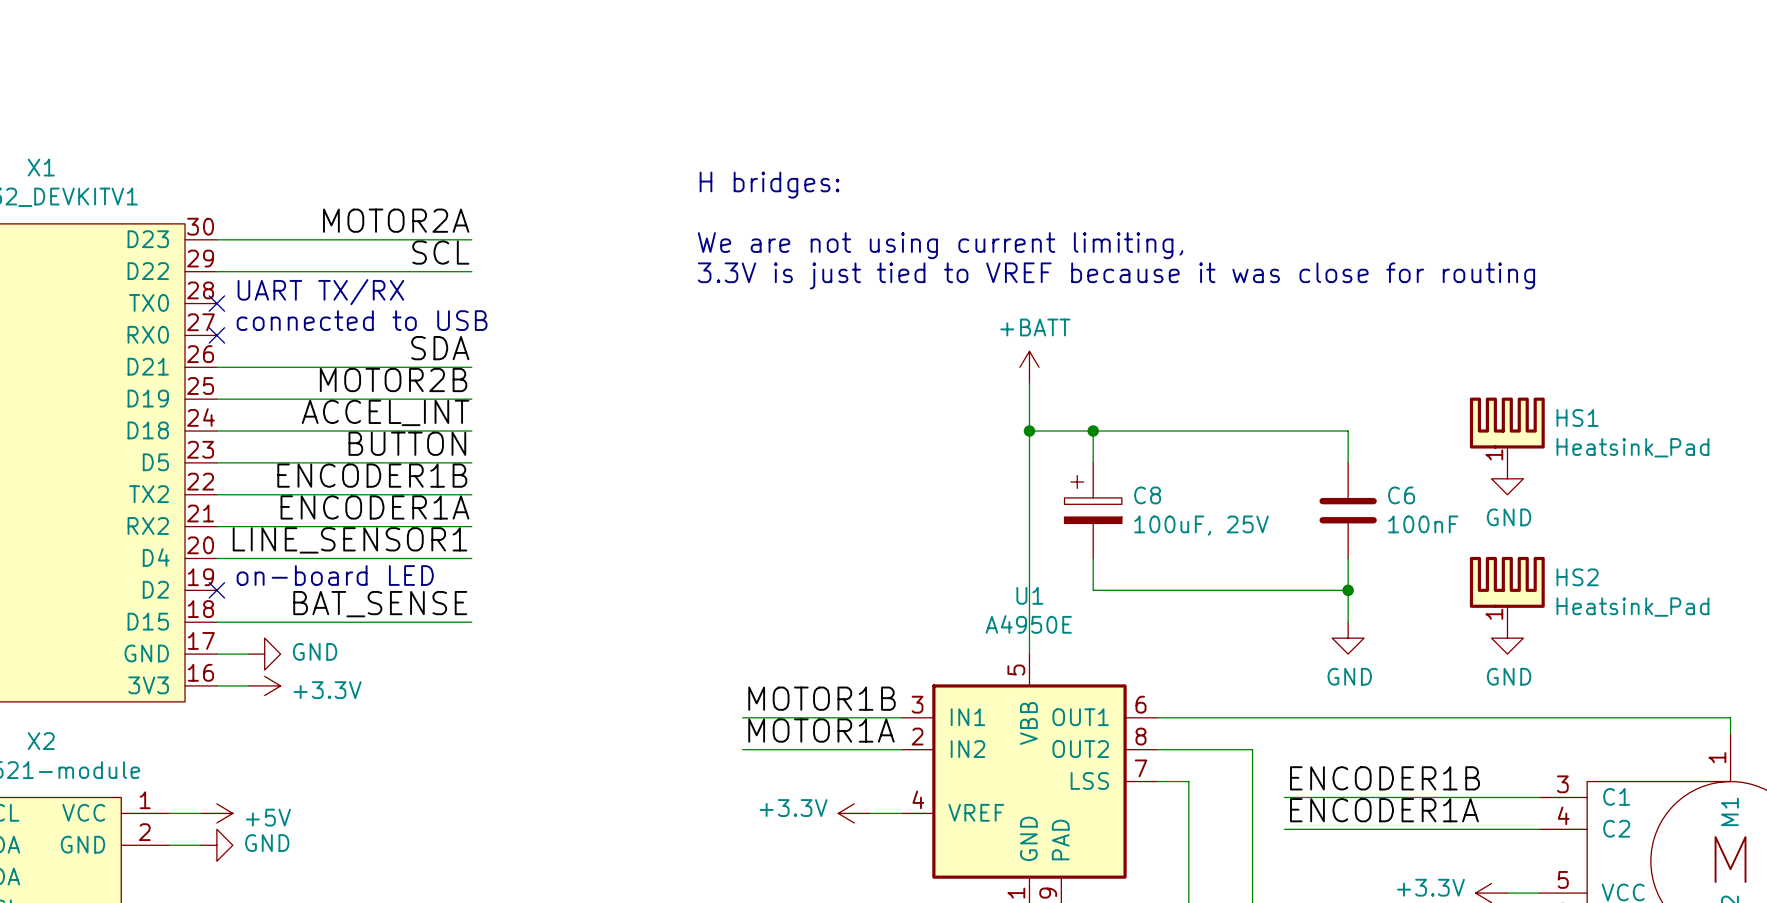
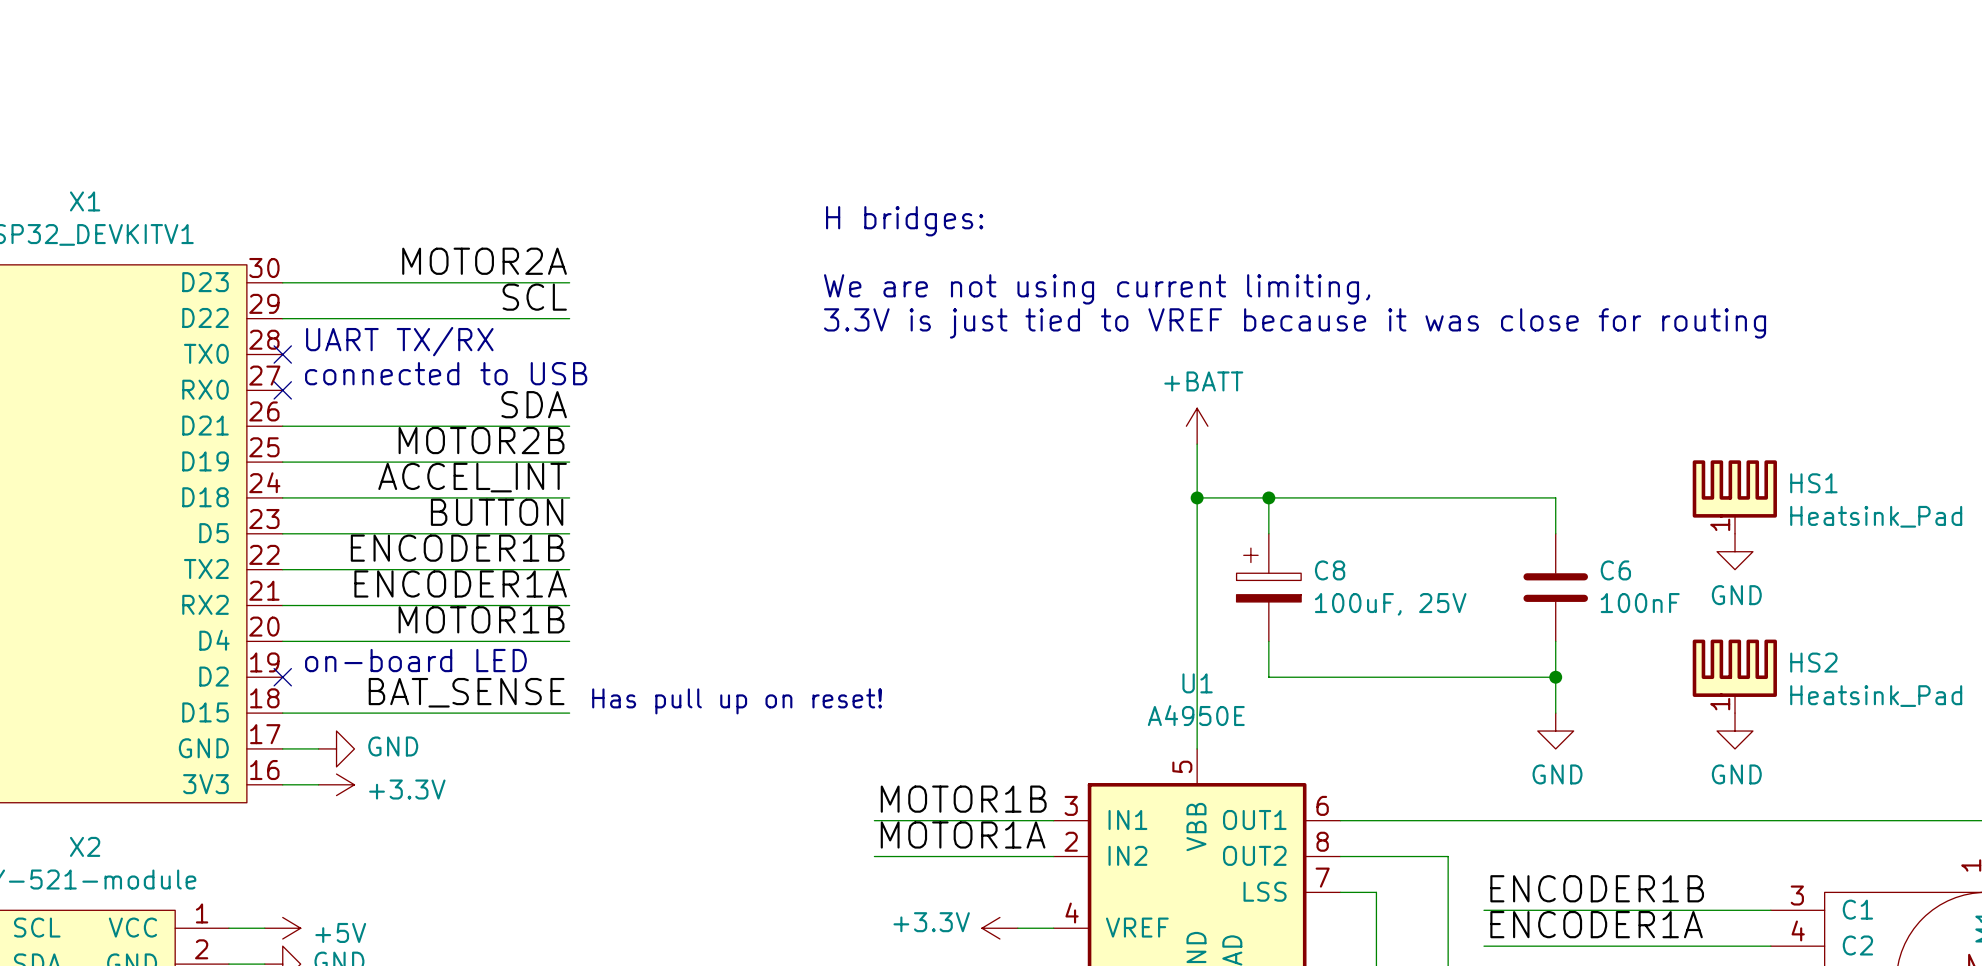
label: LINE_SENSOR1 (349, 540) -> MOTOR1B (481, 619)
text: none -> Has pull up on reset! (737, 701)

